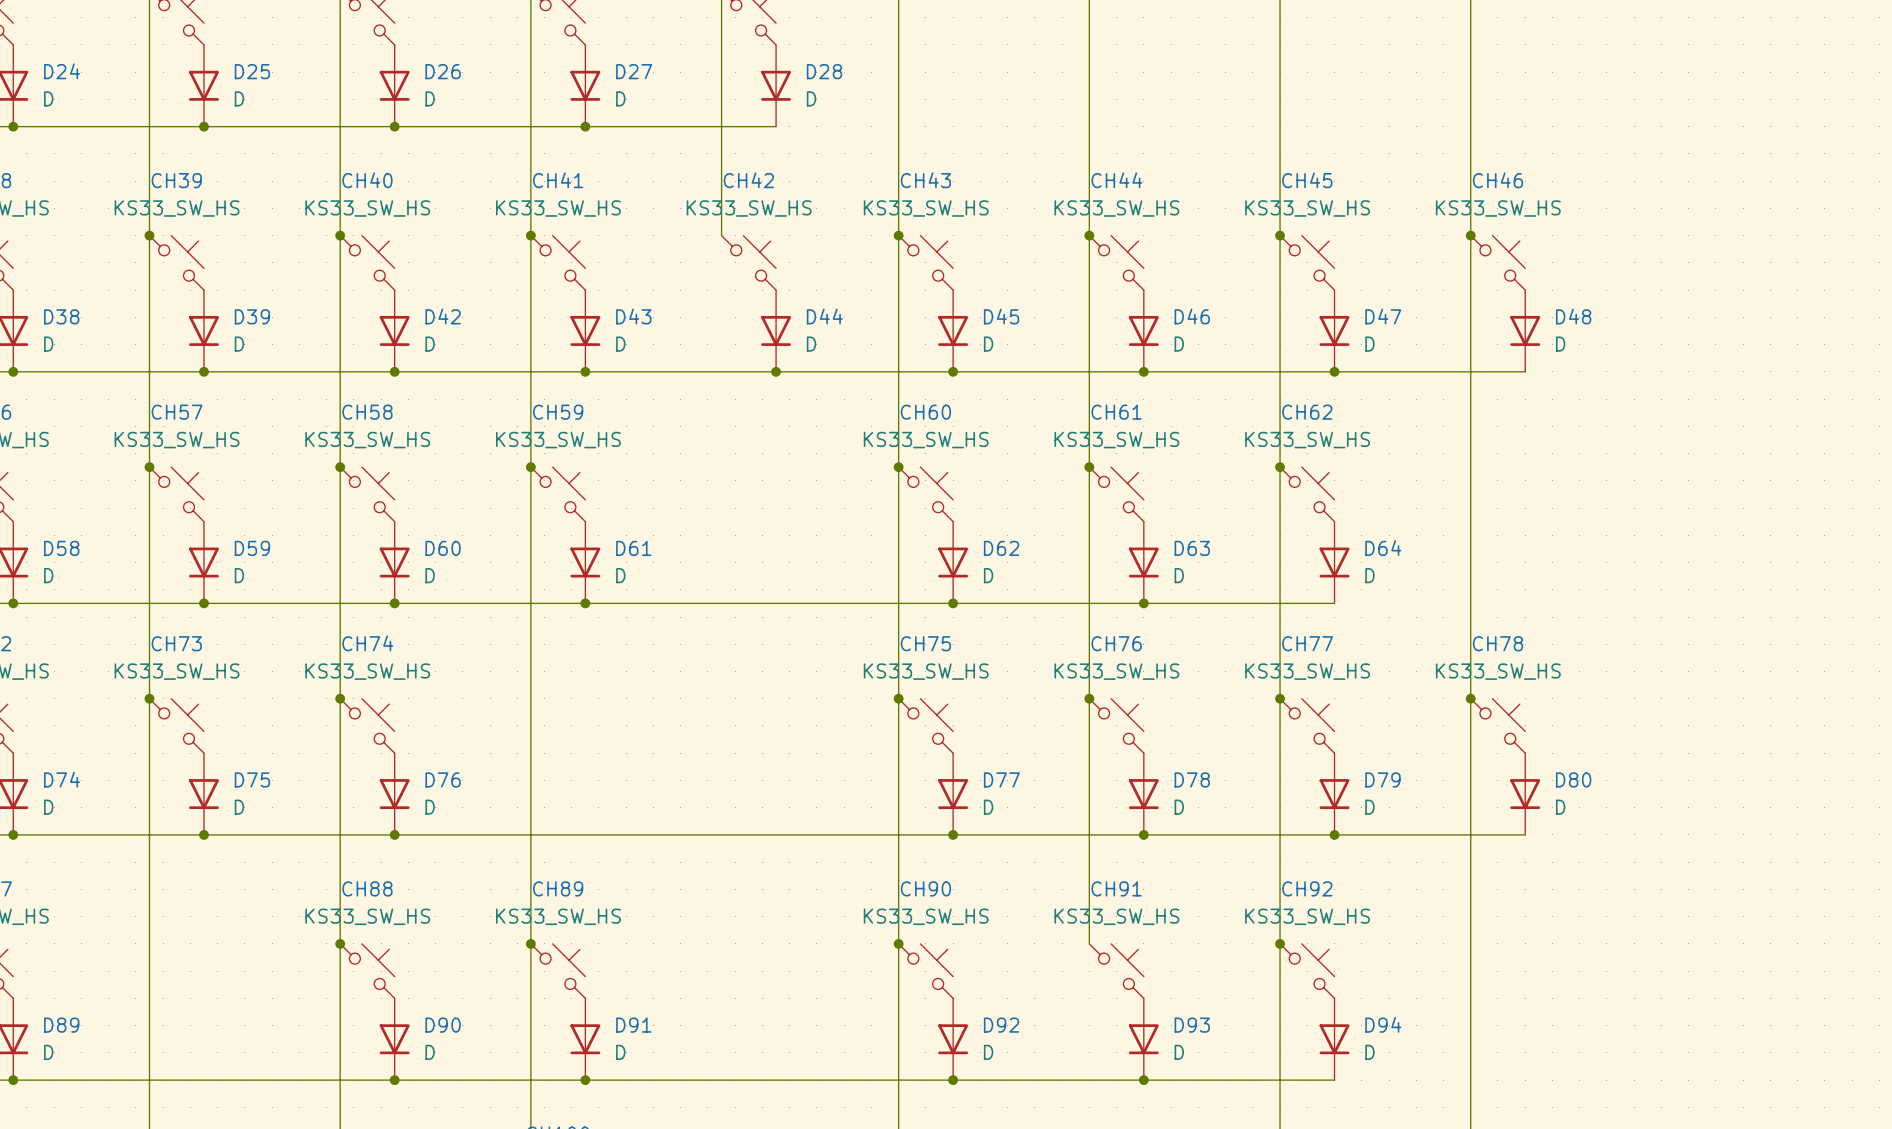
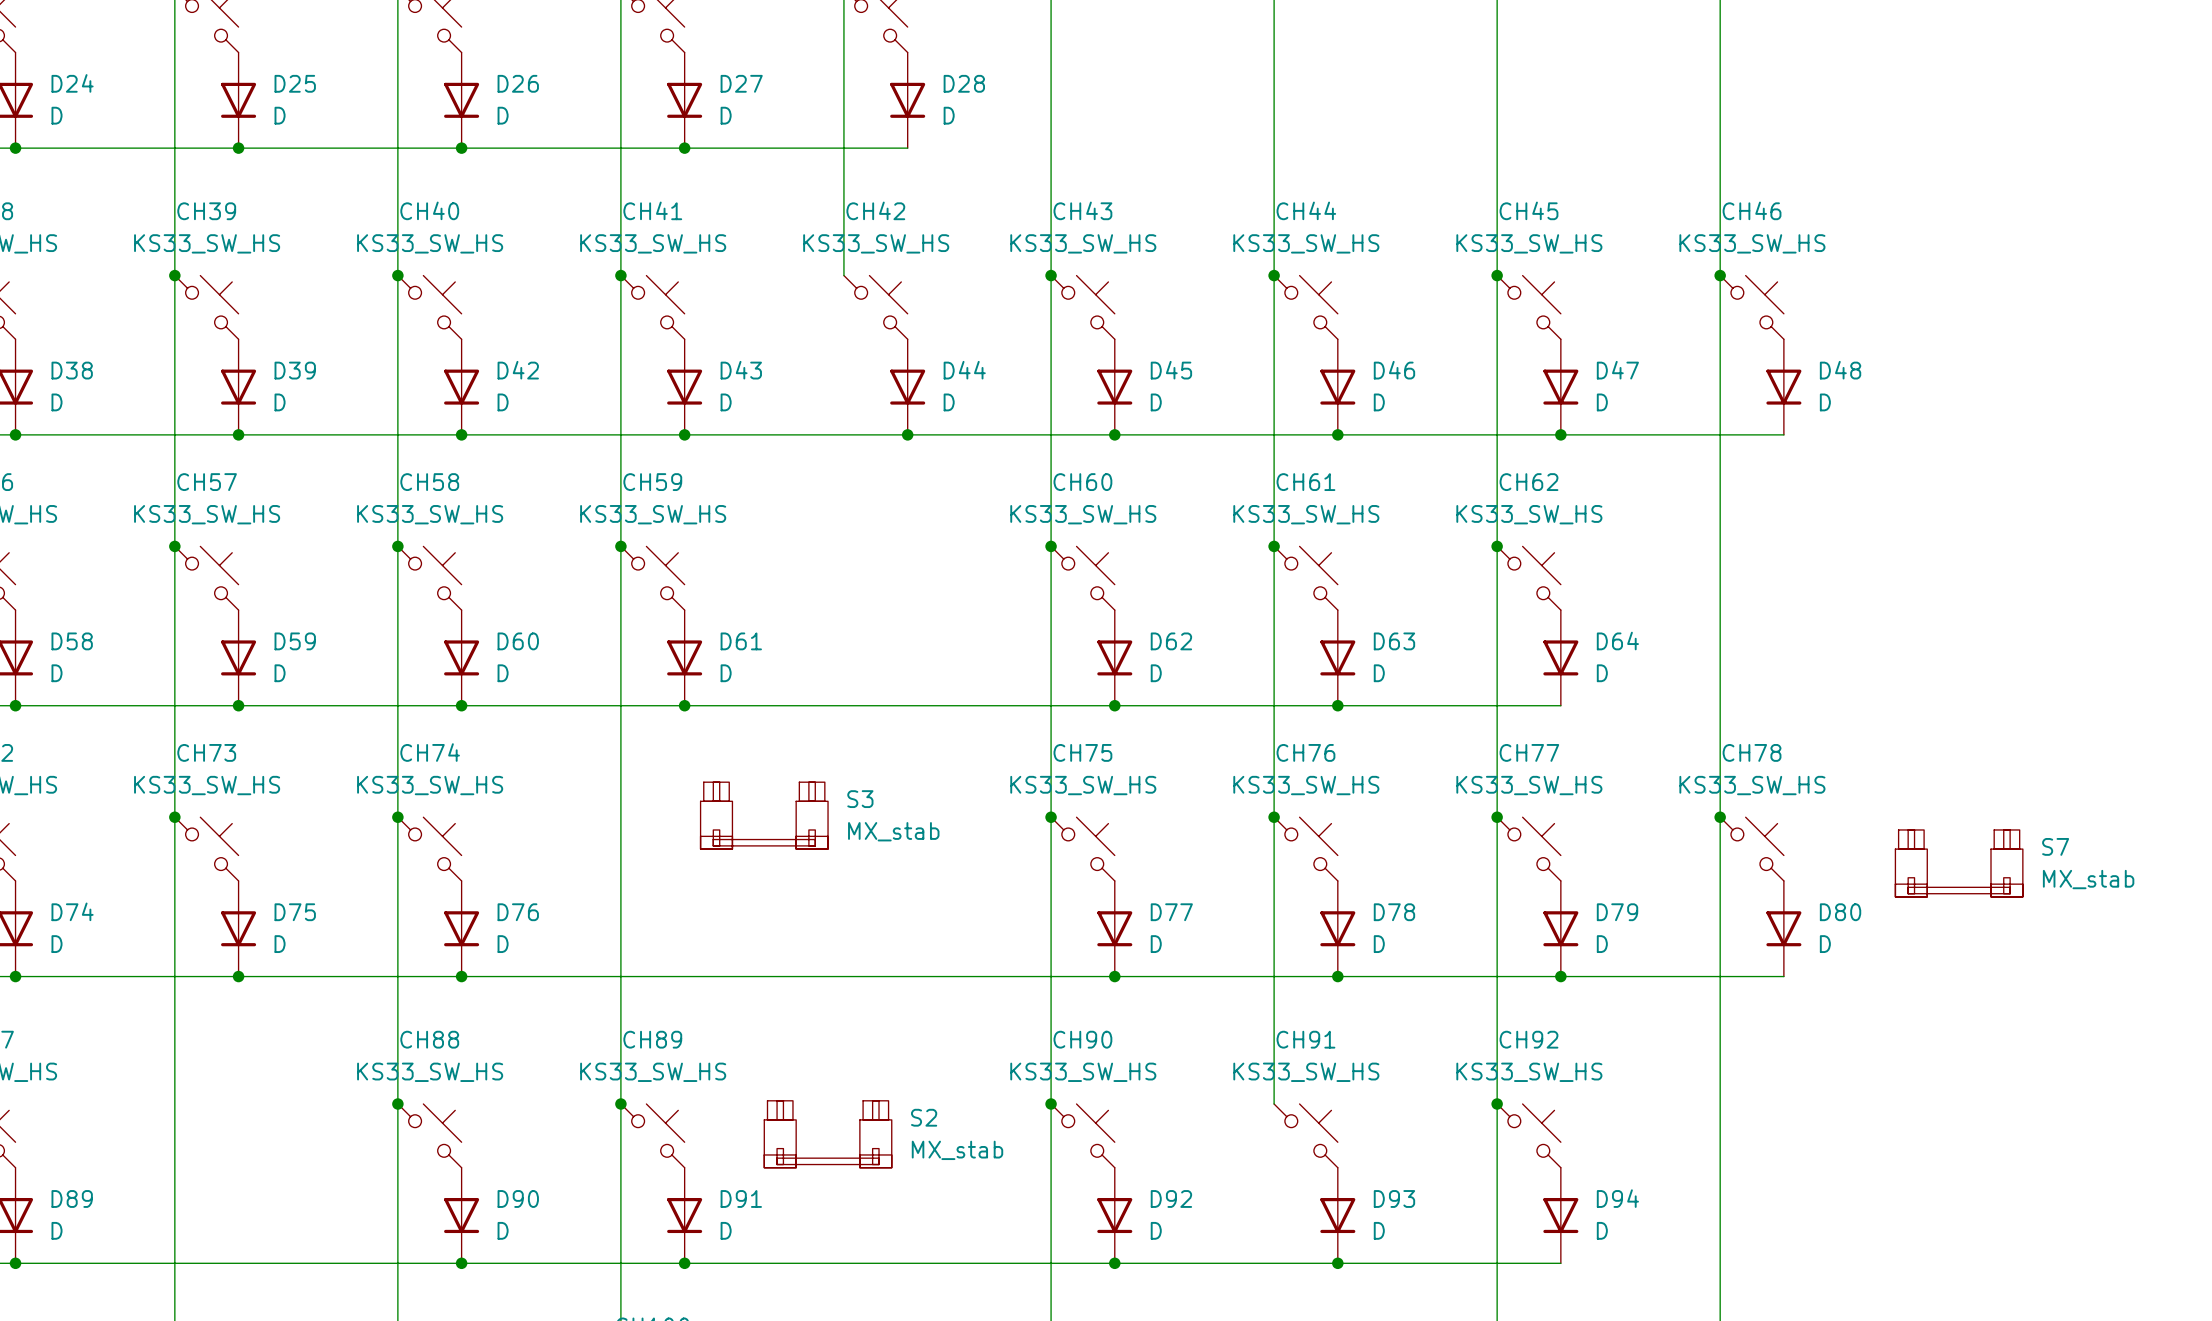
S3: none -> MX_stab (764, 815)
S7: none -> MX_stab (1959, 863)
S2: none -> MX_stab (828, 1134)

